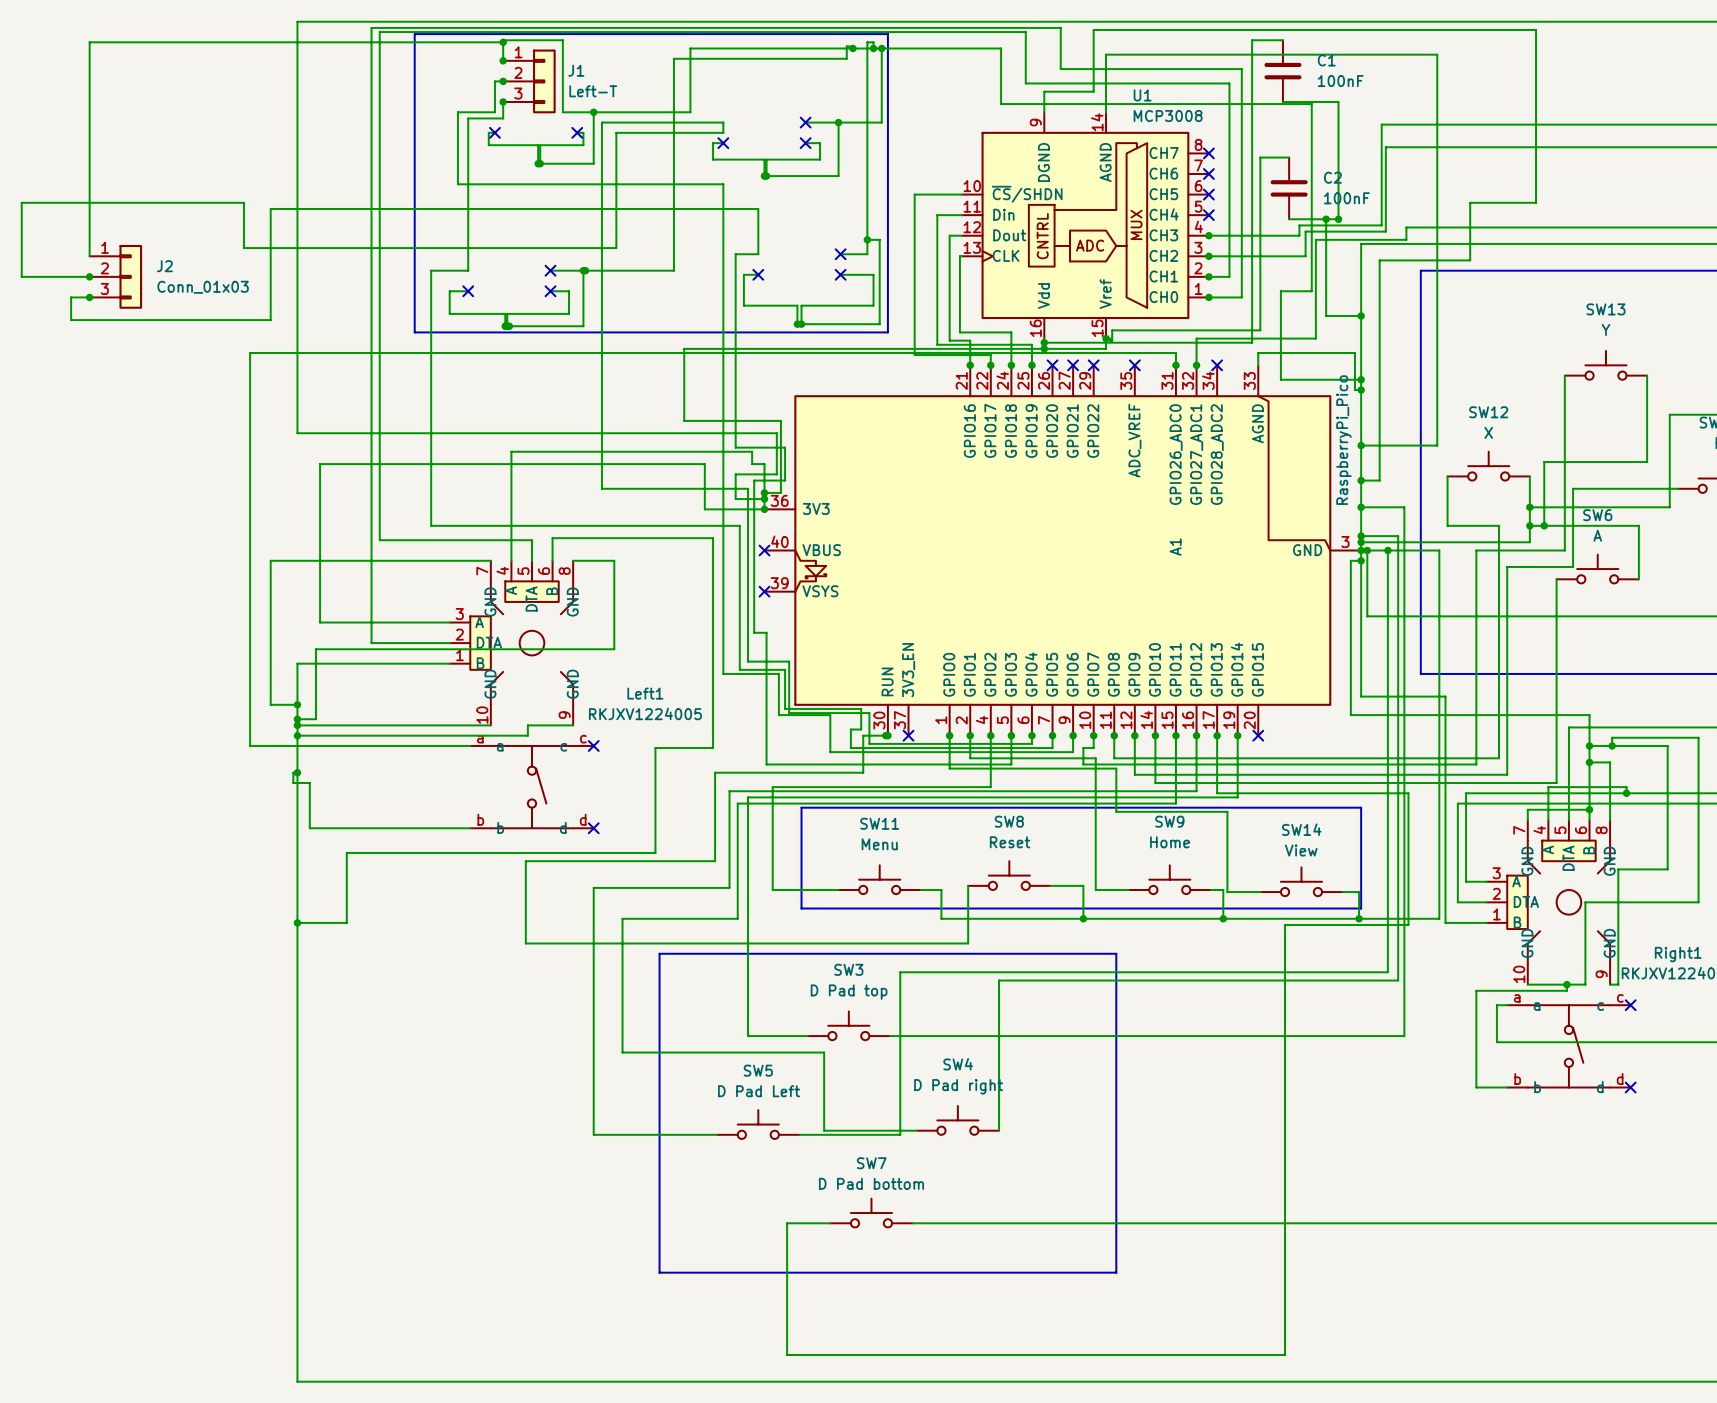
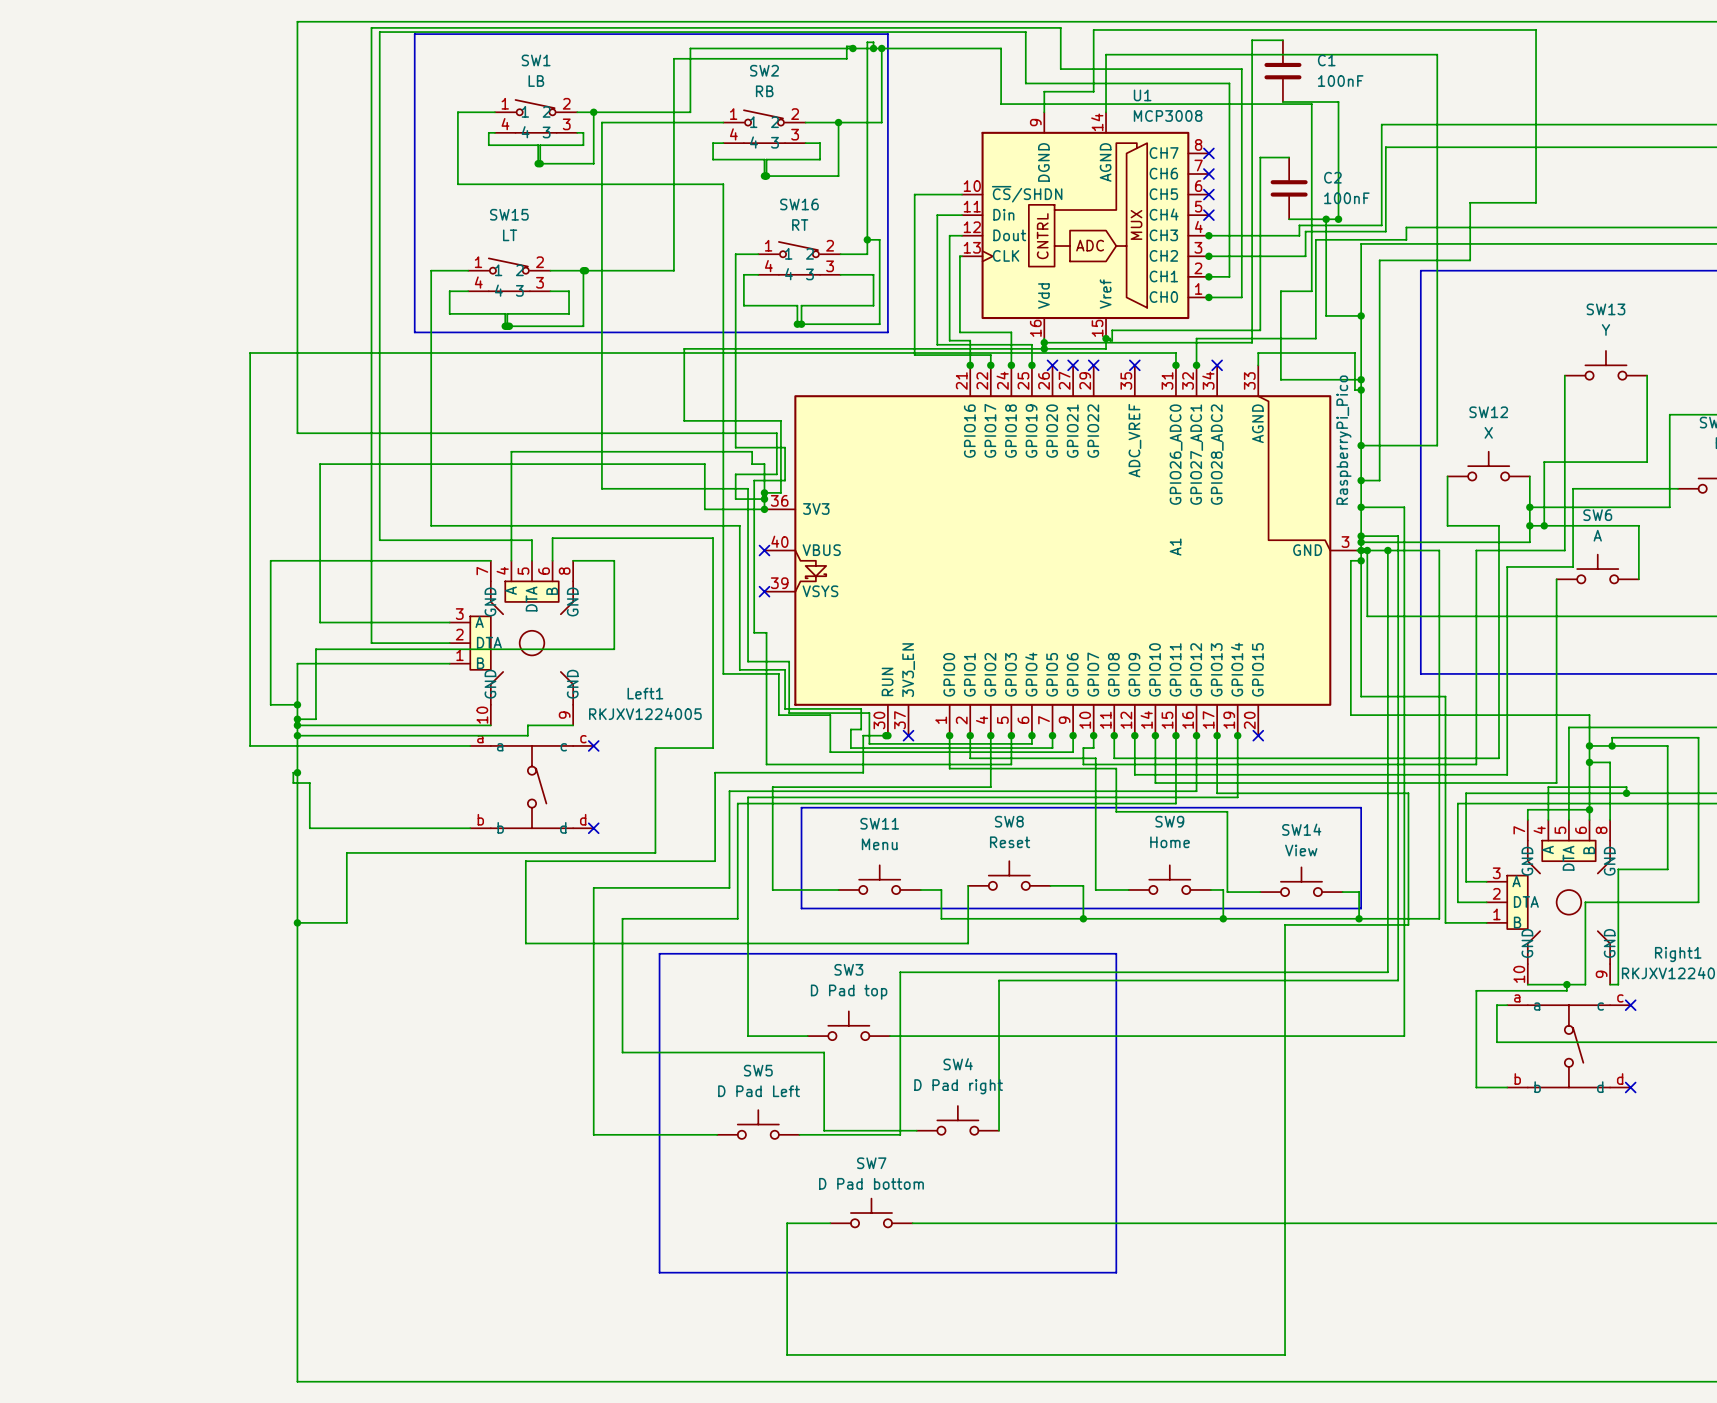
wire: (503, 42) (89, 42) (89, 256) -> none
junction: (503, 42) -> none
junction: (503, 60) -> none
wire: (503, 62) (503, 40) (562, 40) (562, 112) (577, 112) -> none
junction: (503, 81) -> none
wire: (505, 81) (494, 81) (494, 112) -> none
J1: Left-T (529, 81) -> none
wire: (503, 99) (503, 118) (468, 118) (468, 270) -> none
junction: (503, 101) -> none
SW1: none -> LB (536, 116)
wire: (723, 122) (723, 132) (616, 132) (616, 248) (243, 248) (243, 202) (21, 202) (21, 276) (91, 276) -> none
no-connect mark: (805, 122) -> none
SW2: none -> RB (764, 126)
no-connect mark: (494, 132) -> none
no-connect mark: (577, 132) -> none
no-connect mark: (723, 143) -> none
no-connect mark: (805, 143) -> none
wire: (758, 254) (758, 208) (270, 208) (270, 320) (71, 320) (71, 297) (93, 297) -> none
no-connect mark: (840, 254) -> none
SW16: none -> RT (799, 258)
no-connect mark: (550, 270) -> none
SW15: none -> LT (509, 274)
no-connect mark: (758, 274) -> none
no-connect mark: (840, 274) -> none
junction: (89, 276) -> none
J2: Conn_01x03 (115, 276) -> none
no-connect mark: (468, 291) -> none
no-connect mark: (550, 291) -> none
junction: (89, 297) -> none

